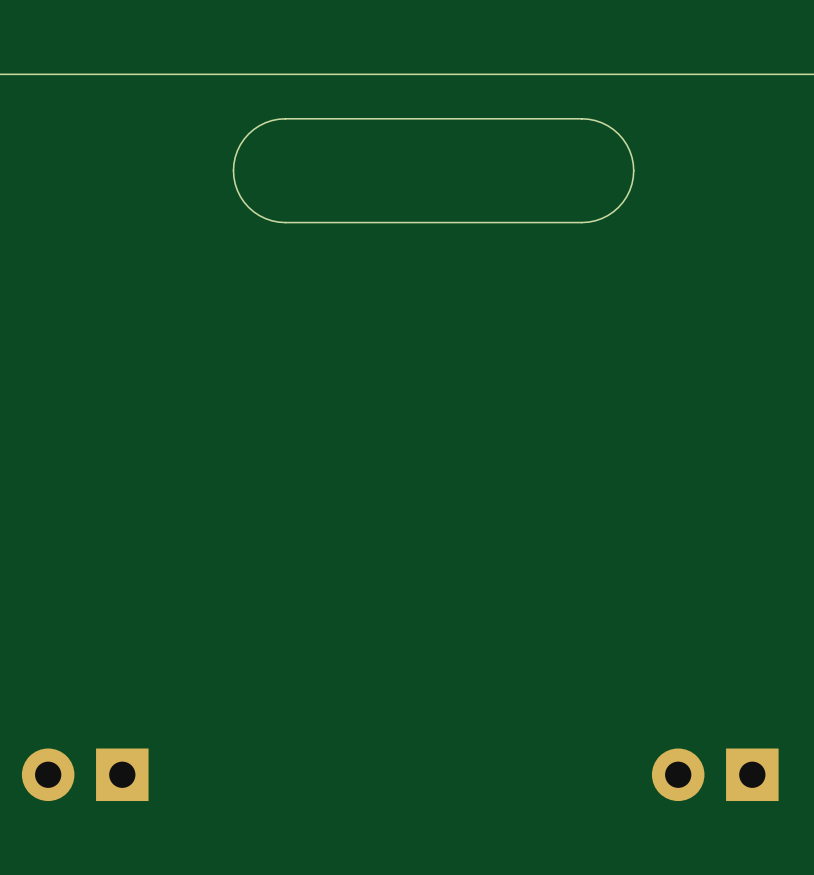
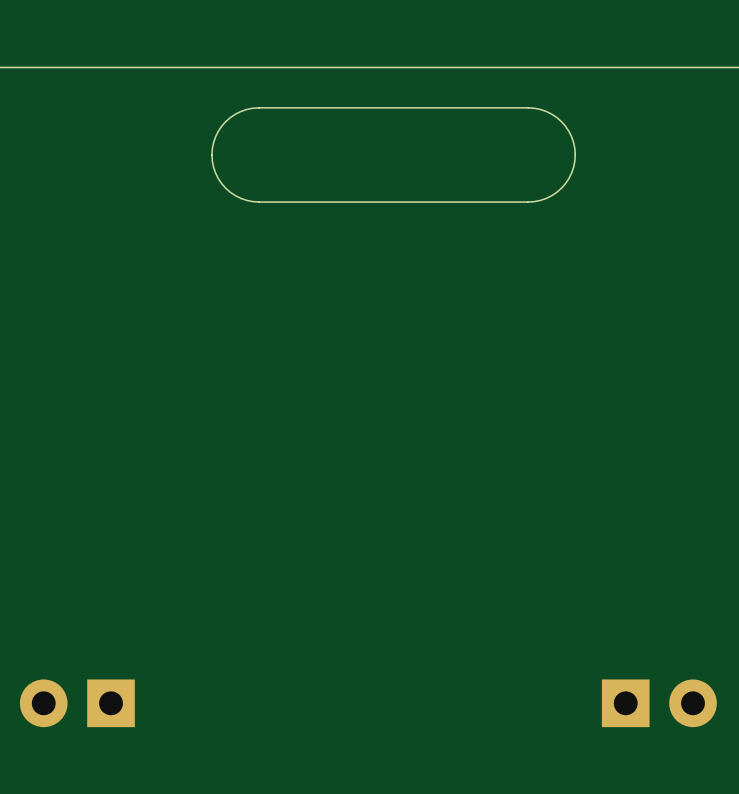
part rotation: 0° (715, 774) -> 180° (659, 703)

